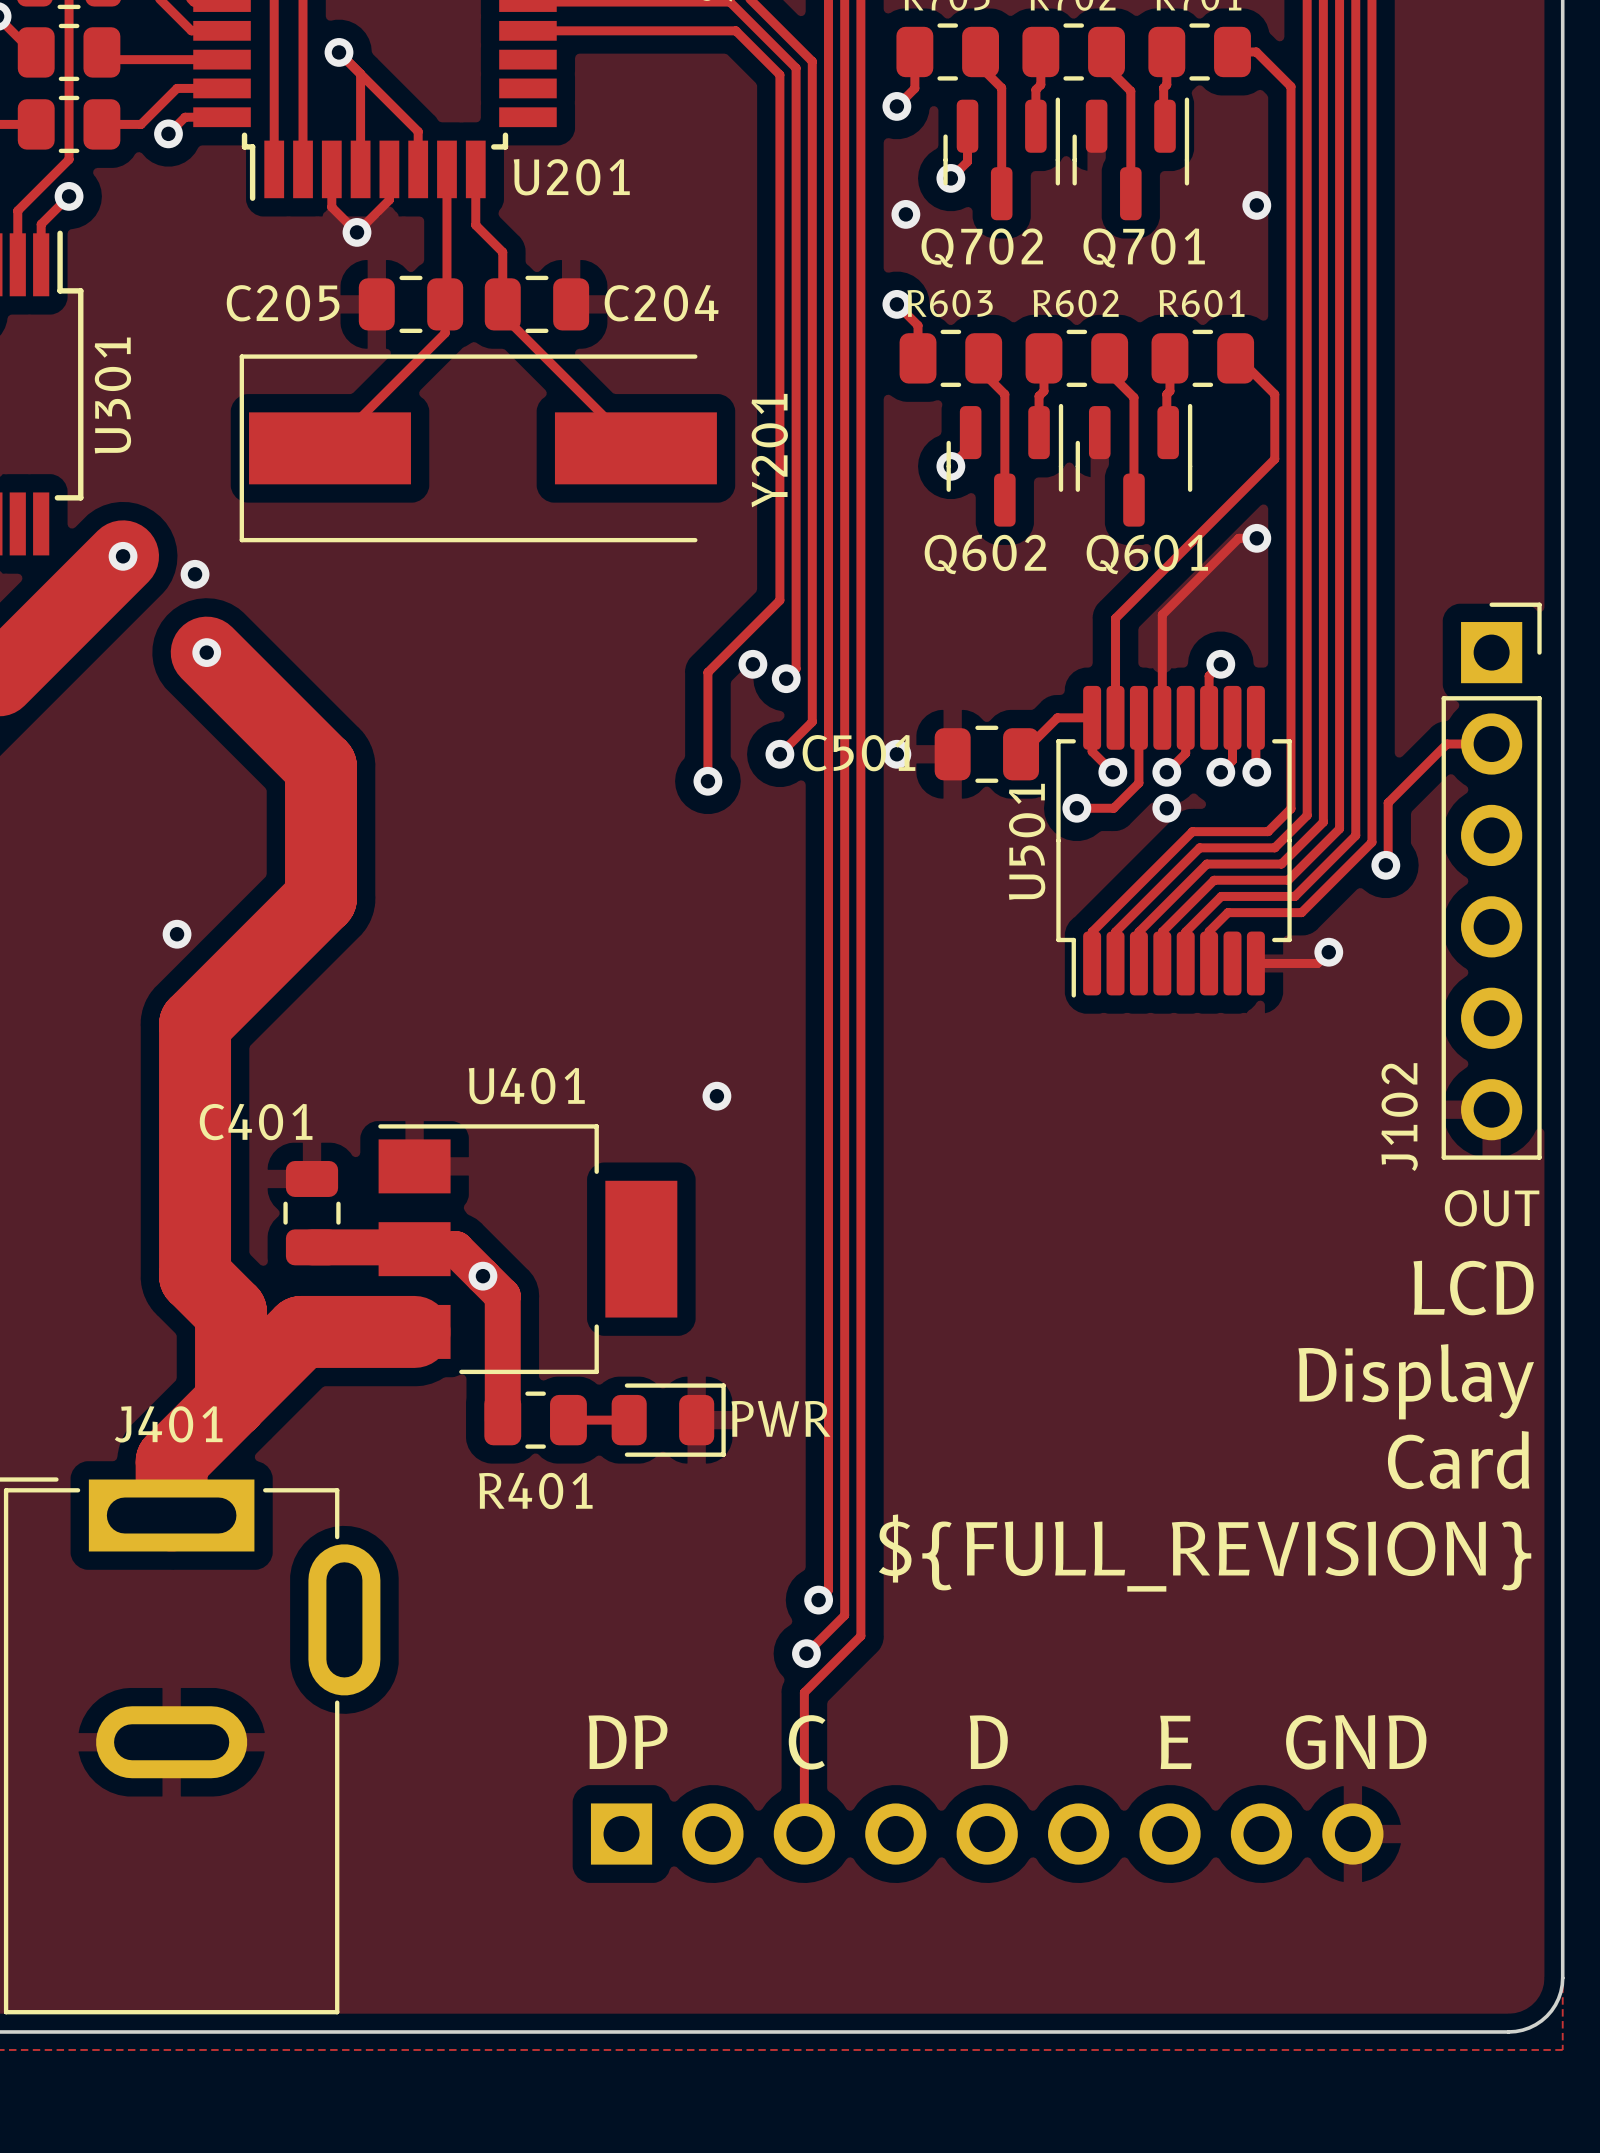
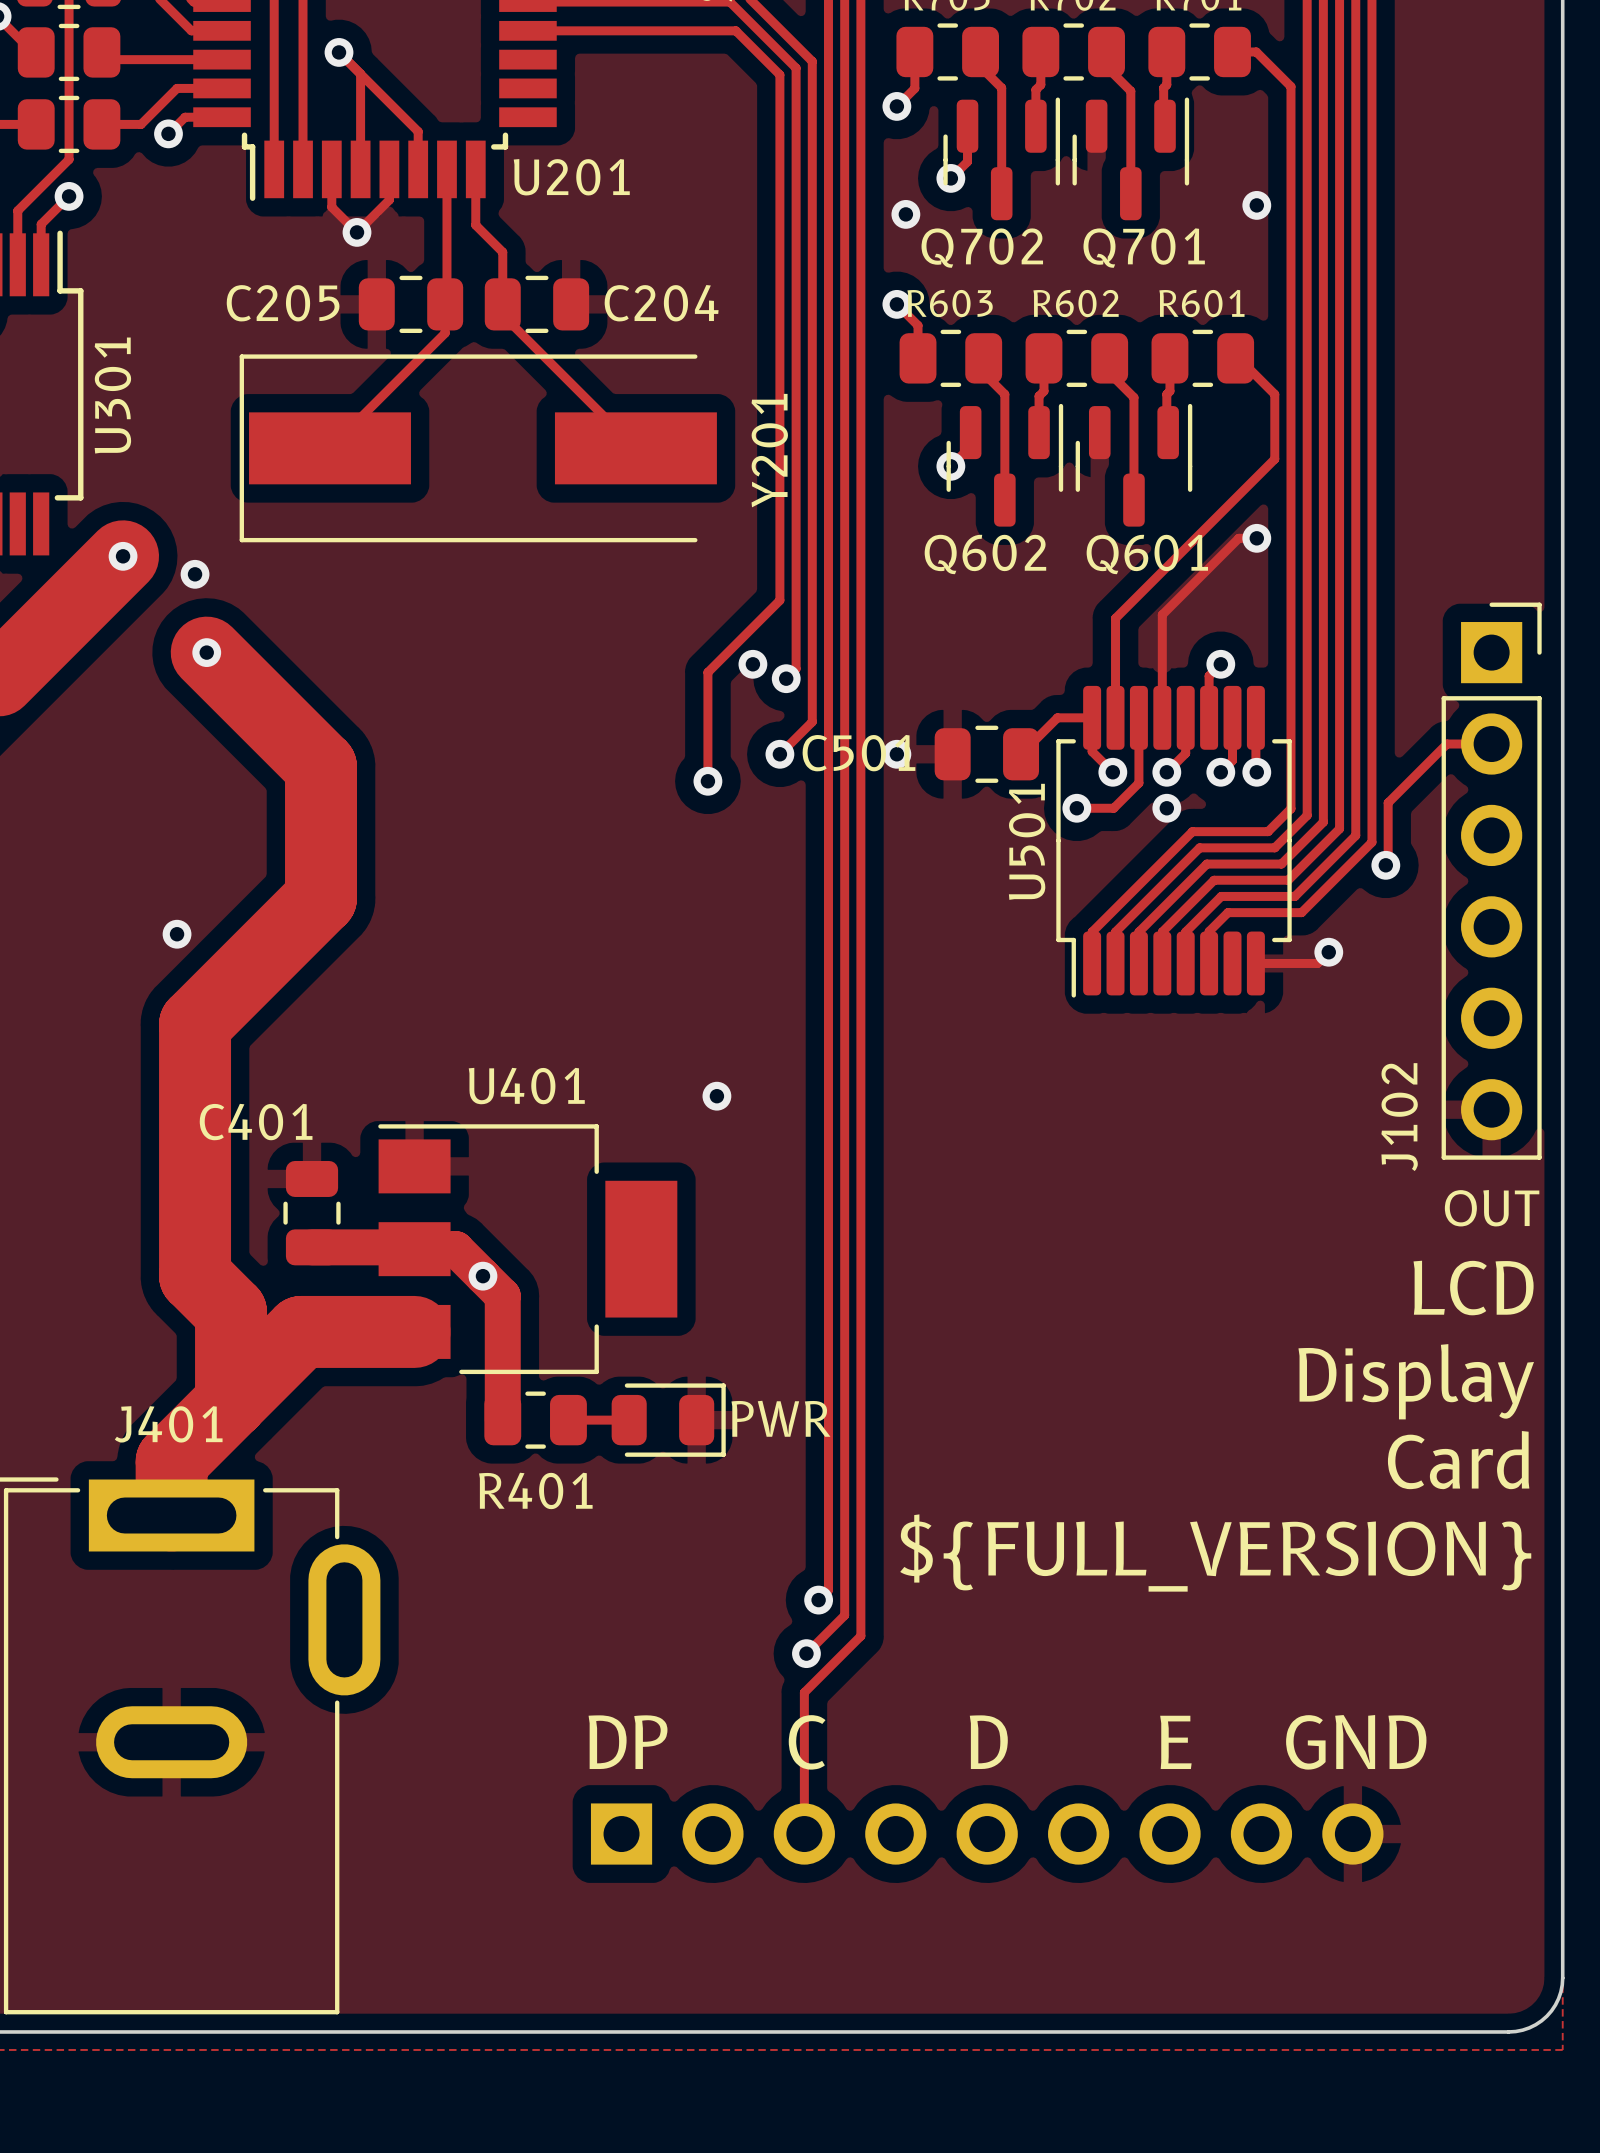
text: ${FULL_REVISION} (1205, 1553) -> ${FULL_VERSION} (1215, 1553)

